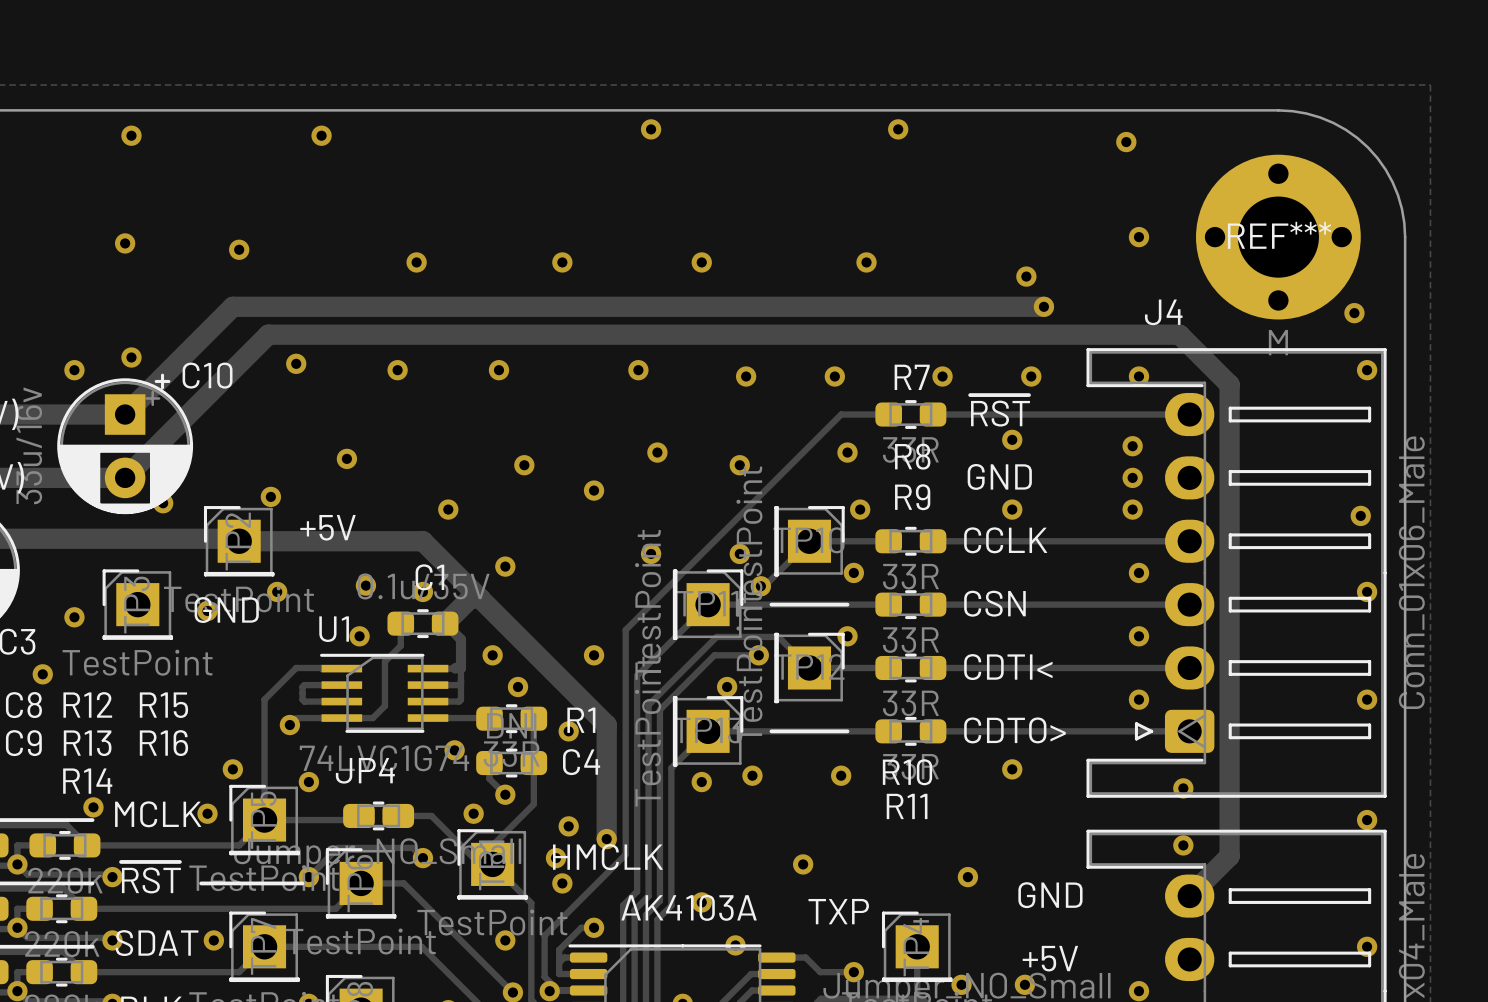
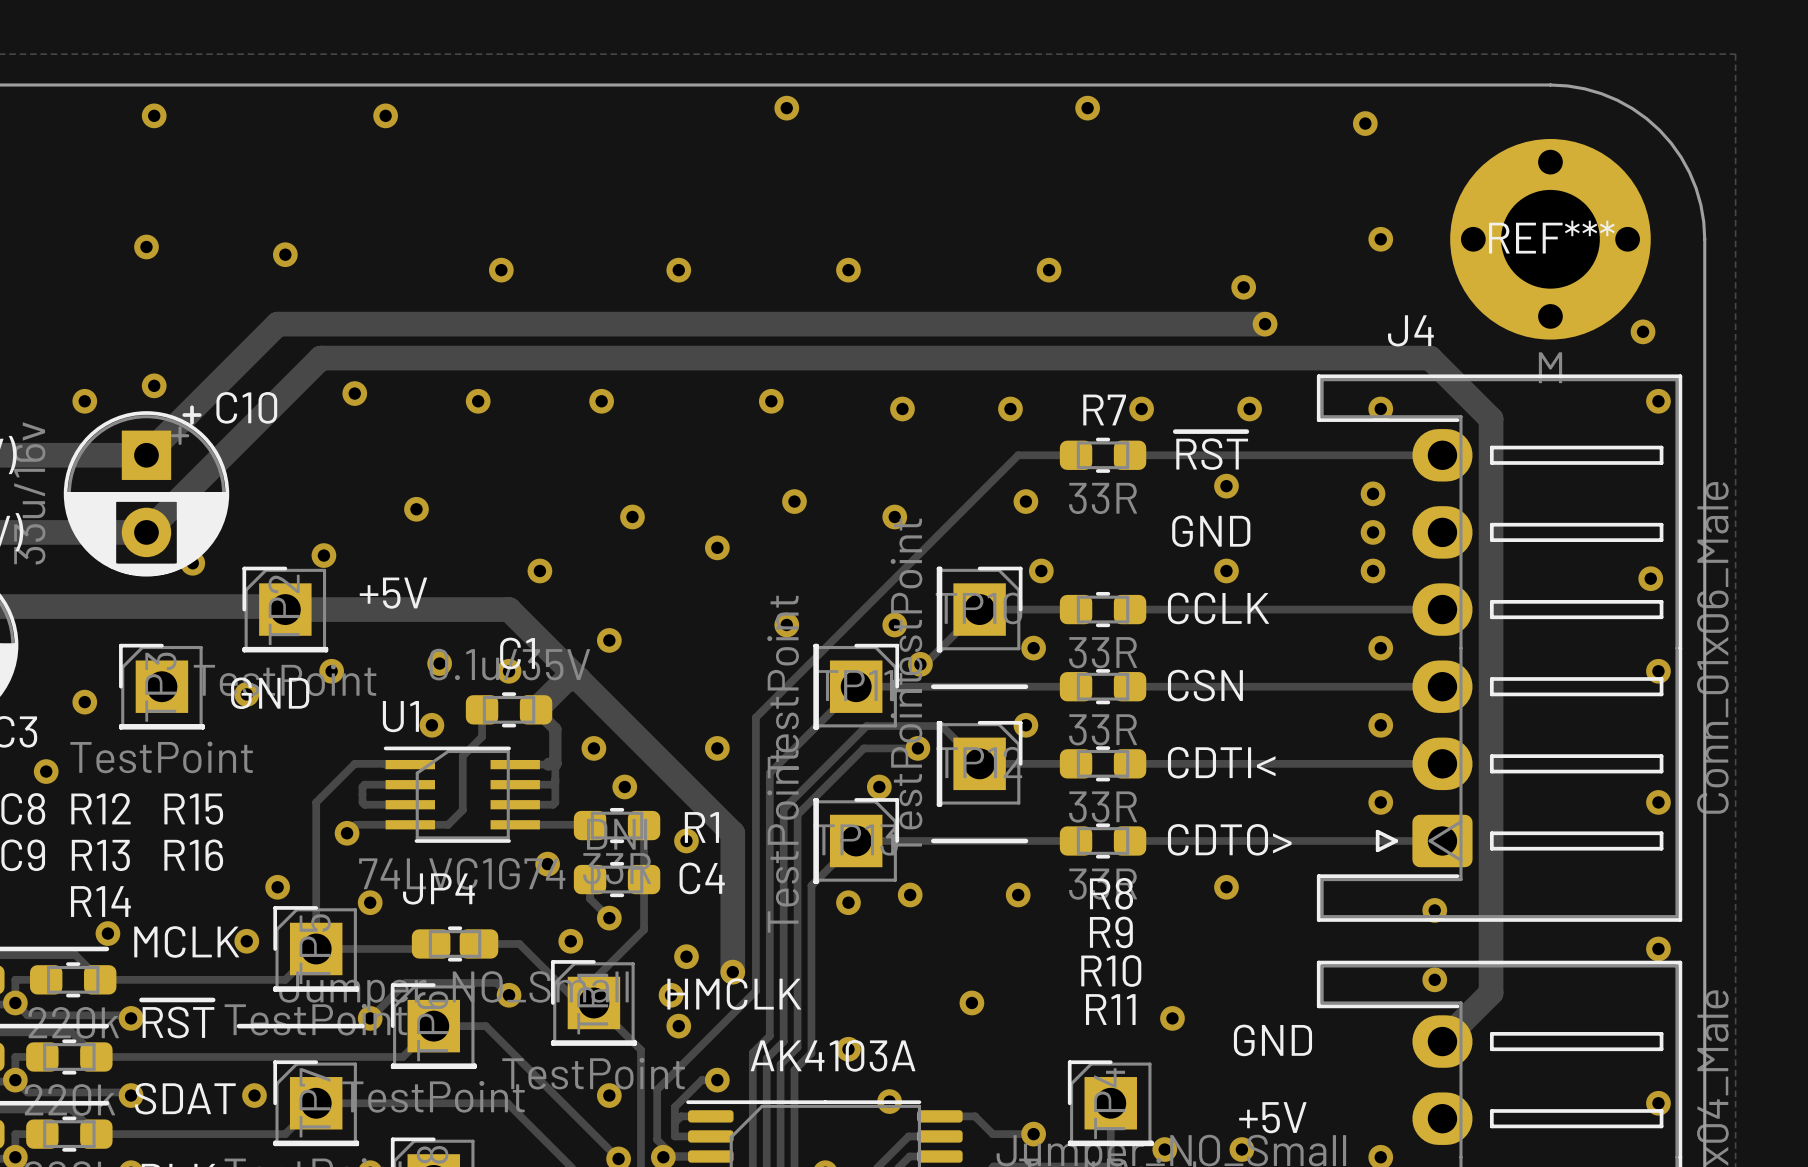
R8 name position: R8 (912, 456) -> R8 (1111, 893)
R9 name position: R9 (912, 497) -> R9 (1111, 932)
R10 name position: R10 (907, 772) -> R10 (1111, 970)
R11 name position: R11 (907, 806) -> R11 (1110, 1009)
text: TXP (838, 911) -> none

